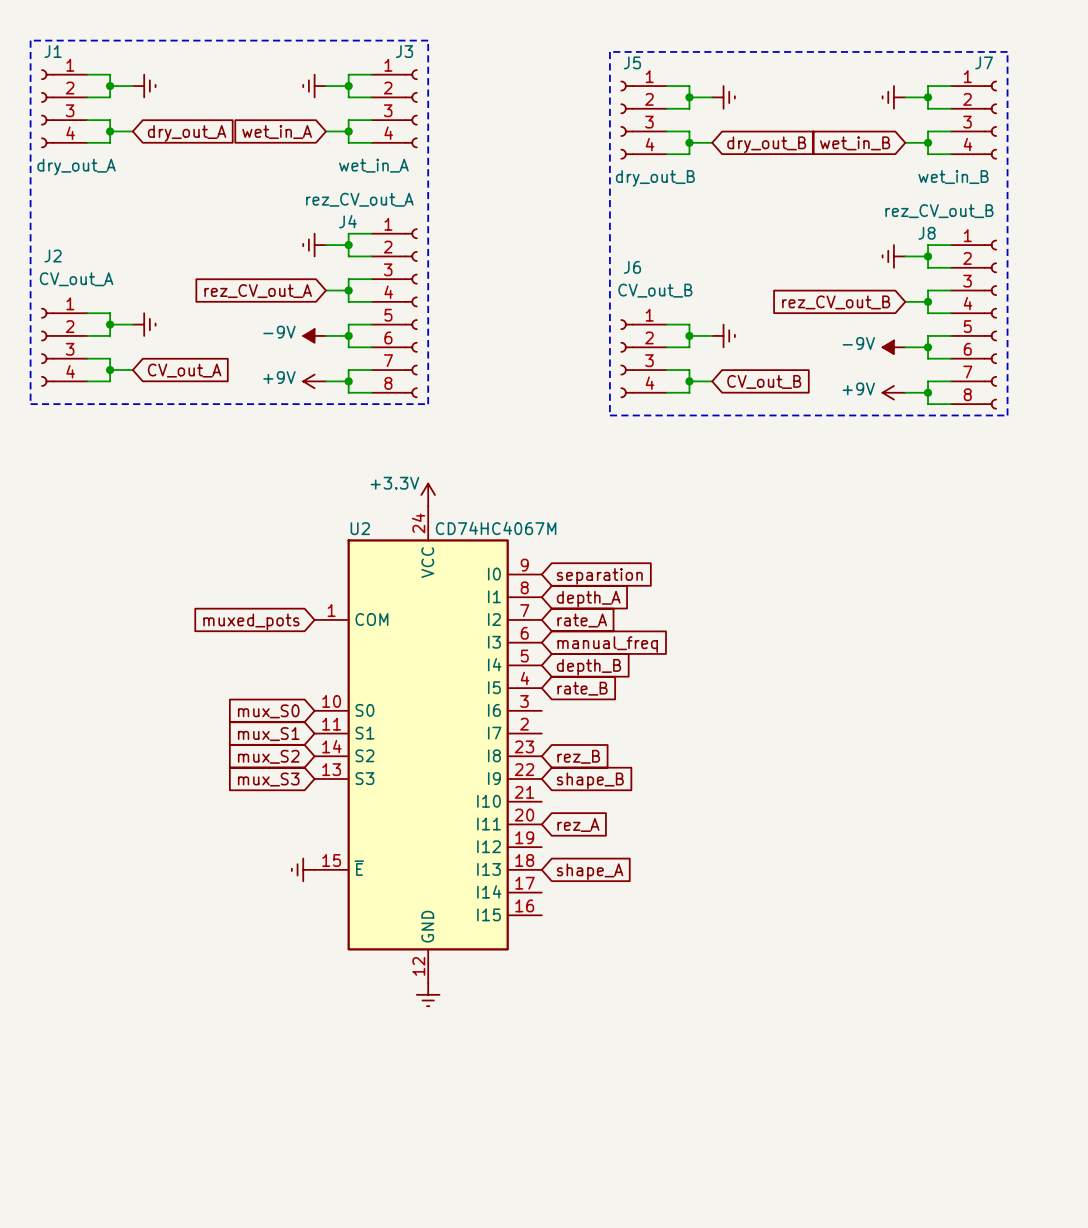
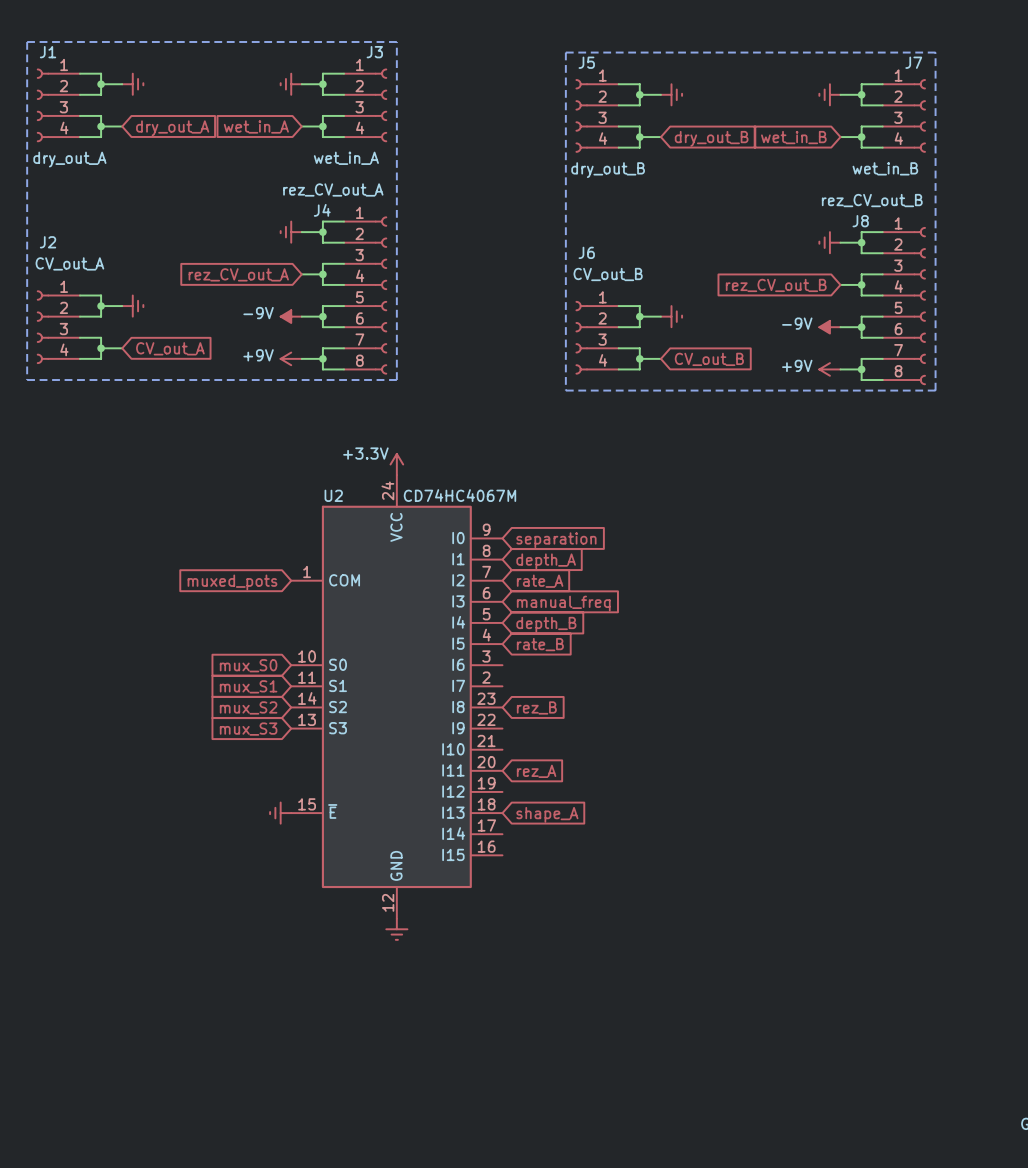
global label: shape_B (590, 780) -> none

